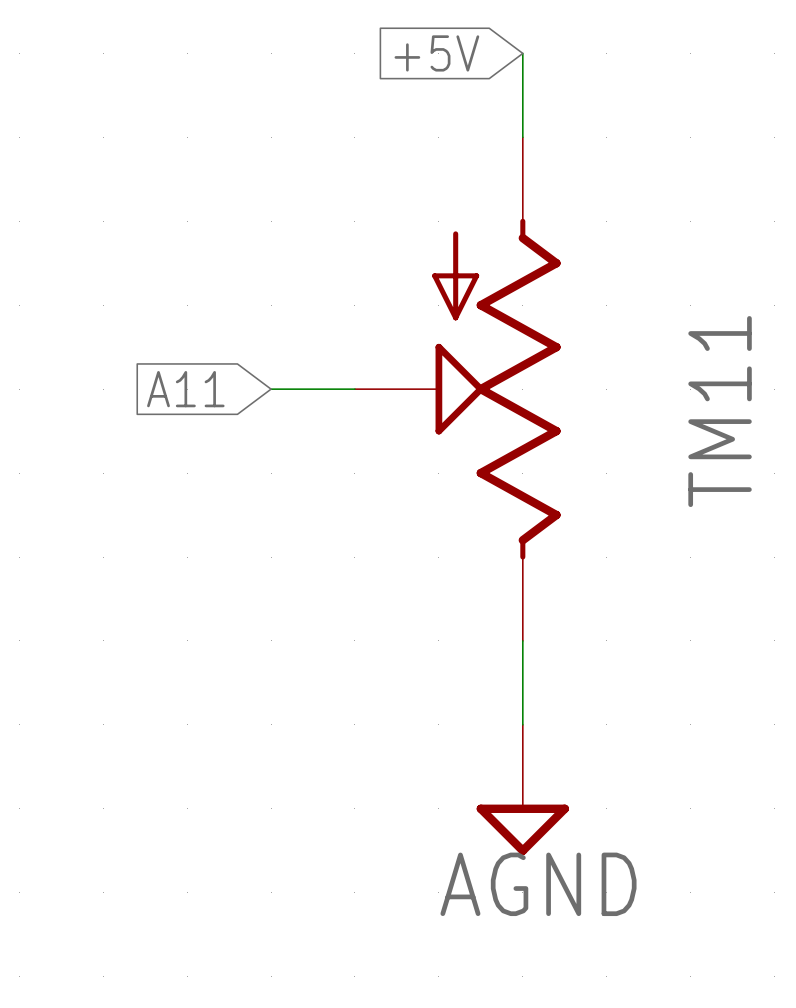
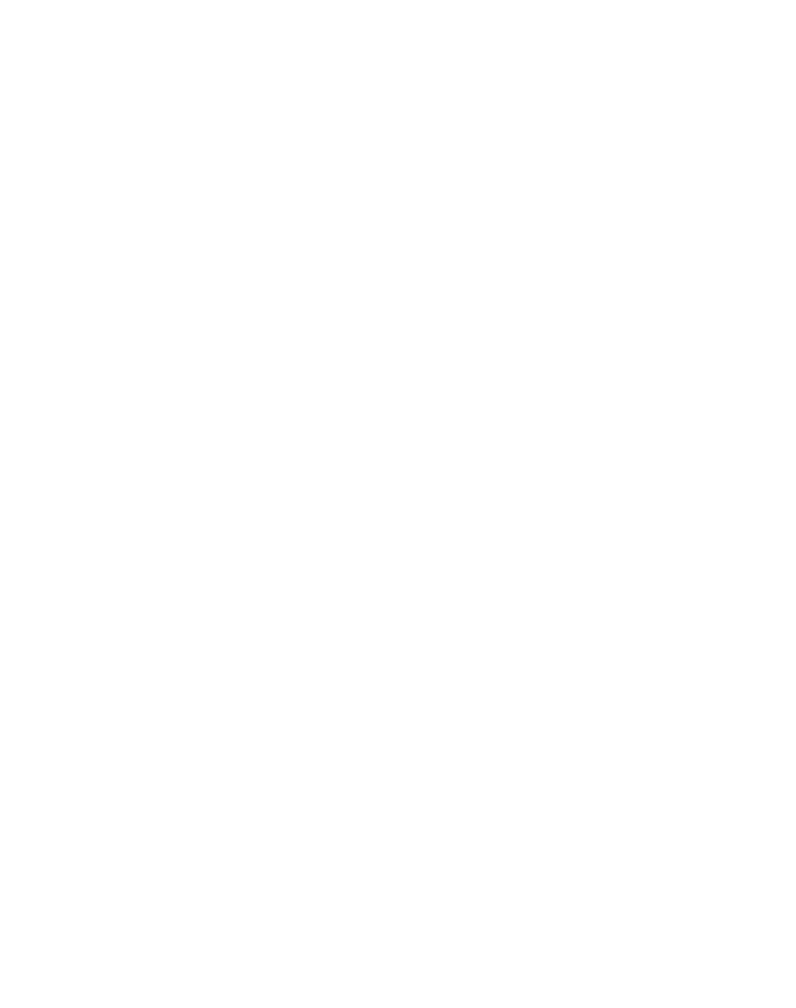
global label: +5V (436, 53) -> none
wire: (522, 53) (522, 137) -> none
global label: A11 (185, 389) -> none
wire: (271, 389) (354, 389) -> none
TM11: (457, 389) -> none
wire: (522, 640) (522, 724) -> none
power symbol: AGND (522, 789) -> none

